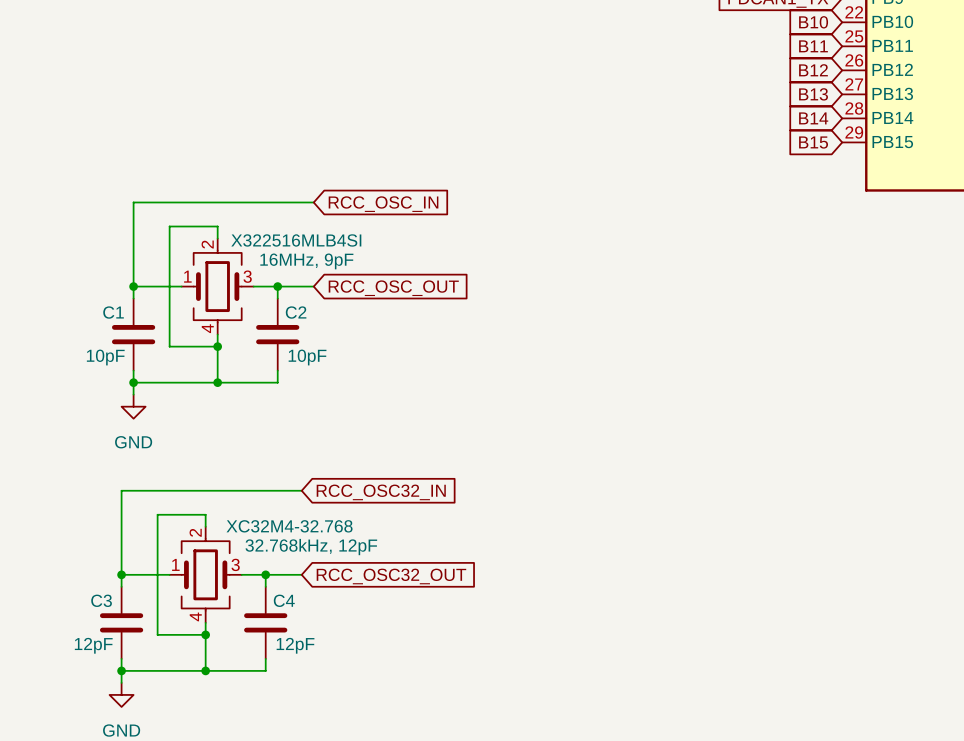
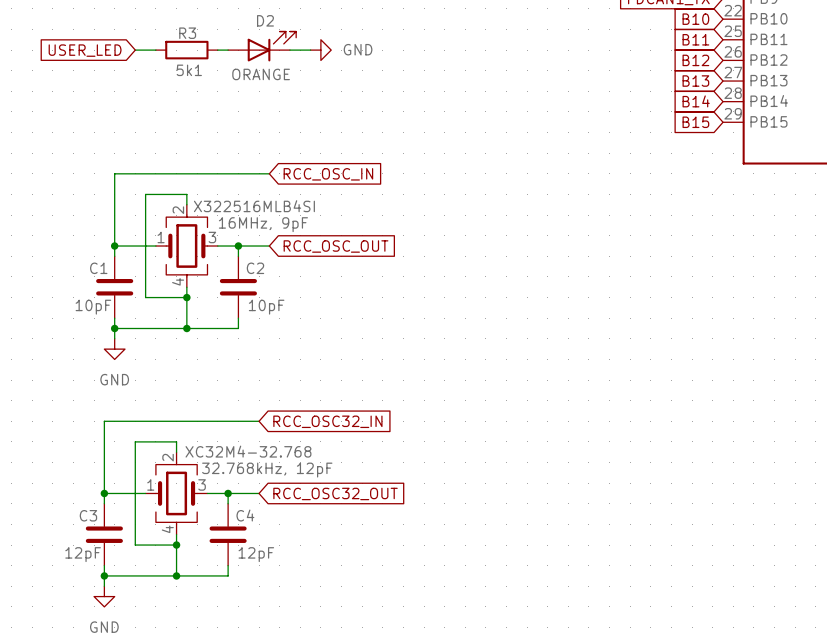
D2: none -> ORANGE (262, 46)
wire: none -> (135, 50) (155, 50)
R3: none -> 5k1 (186, 50)
wire: none -> (217, 50) (228, 50)
wire: none -> (289, 50) (310, 50)
power symbol: none -> GND (320, 50)
global label: none -> USER_LED (85, 50)

